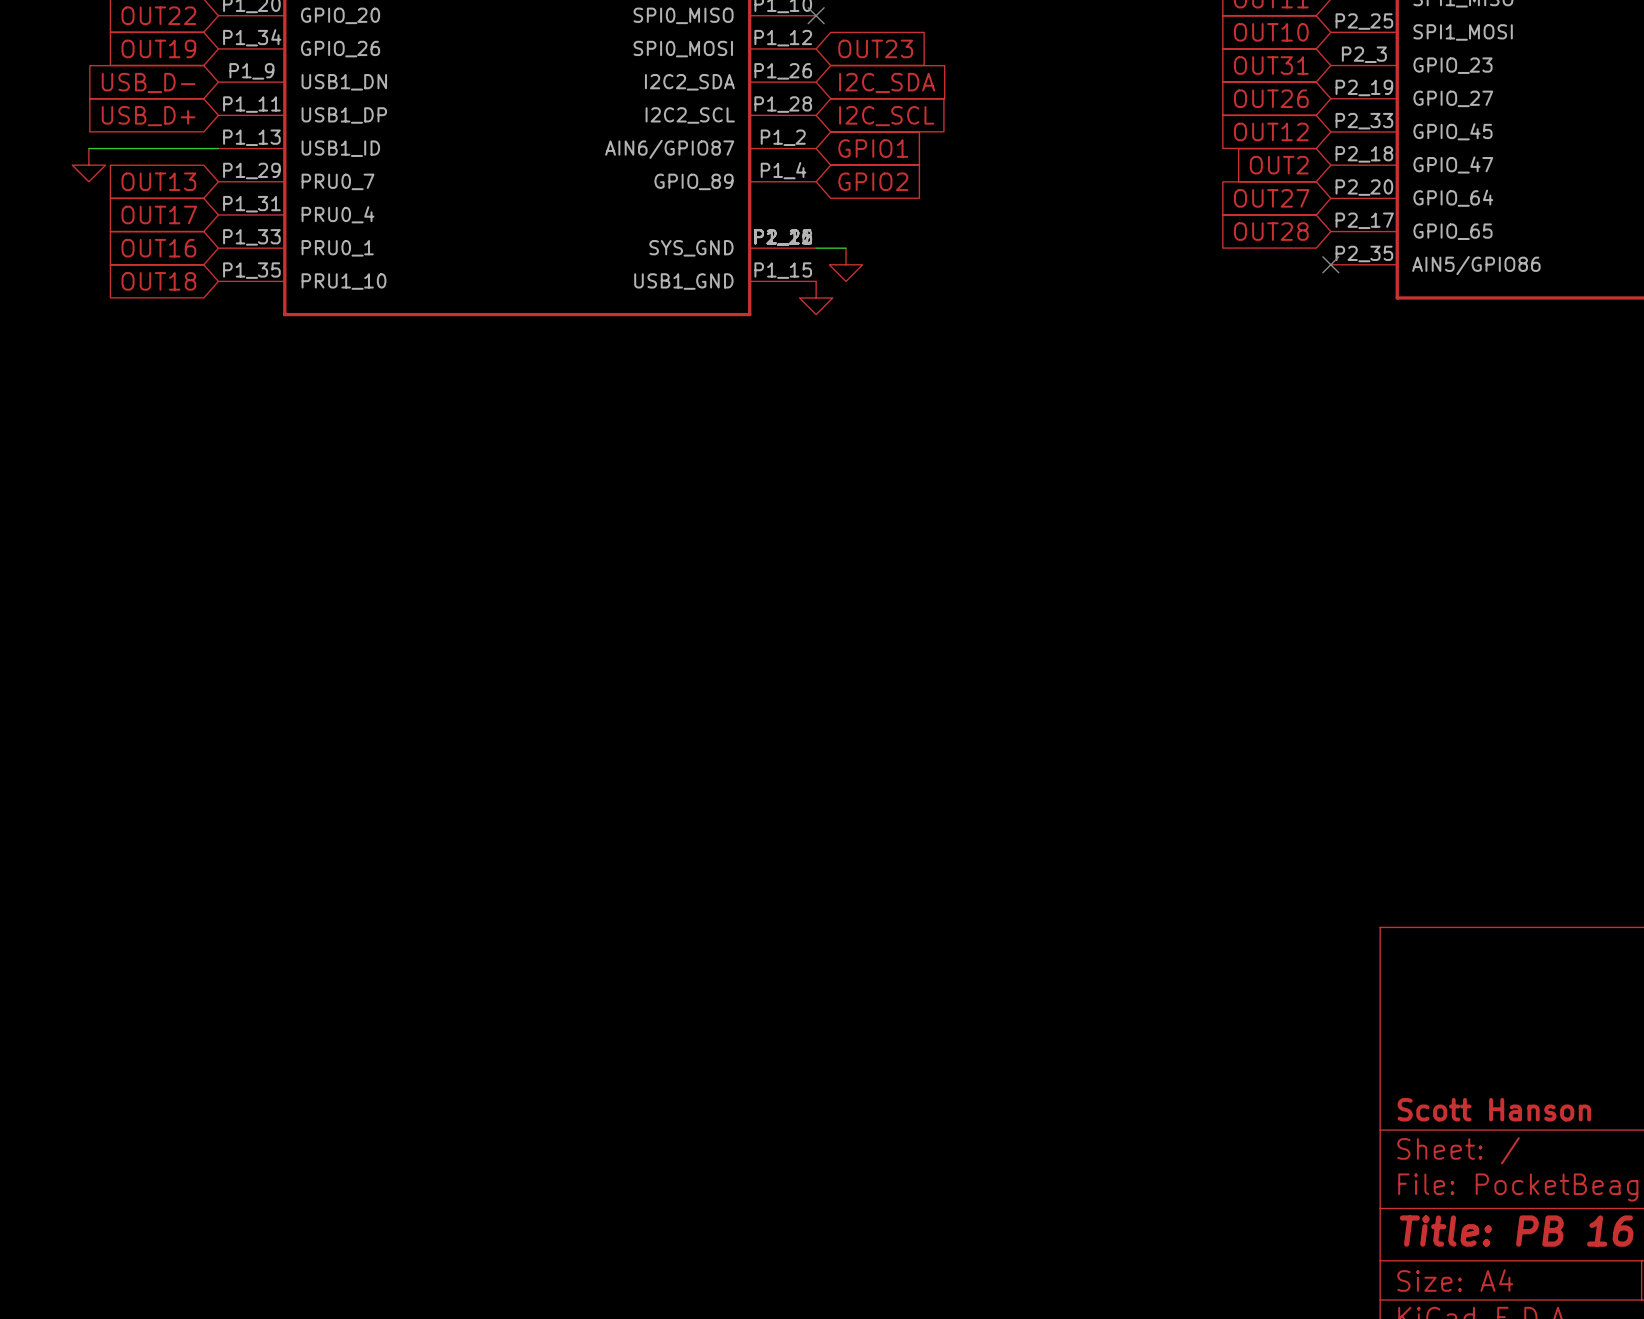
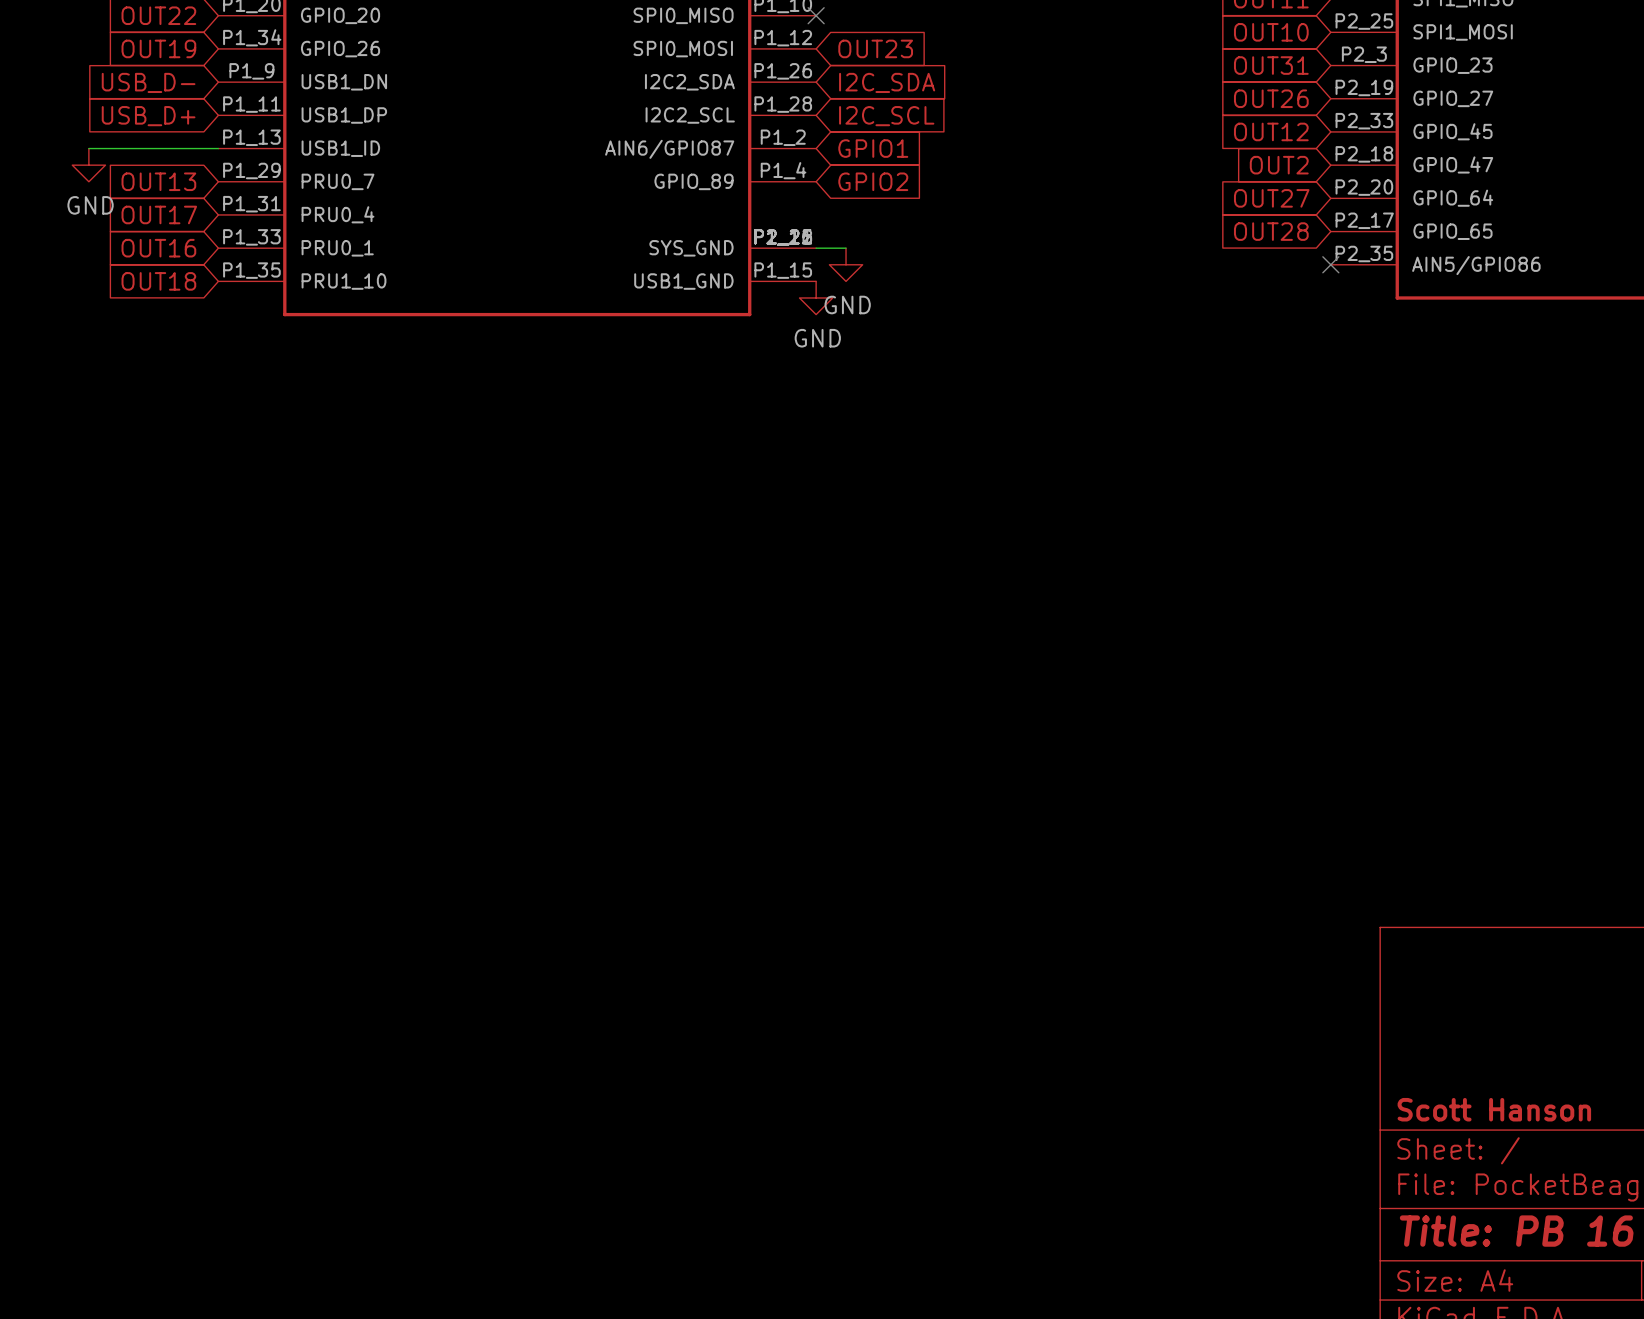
power symbol text: none -> GND (90, 205)
power symbol text: none -> GND (847, 305)
power symbol text: none -> GND (817, 338)

